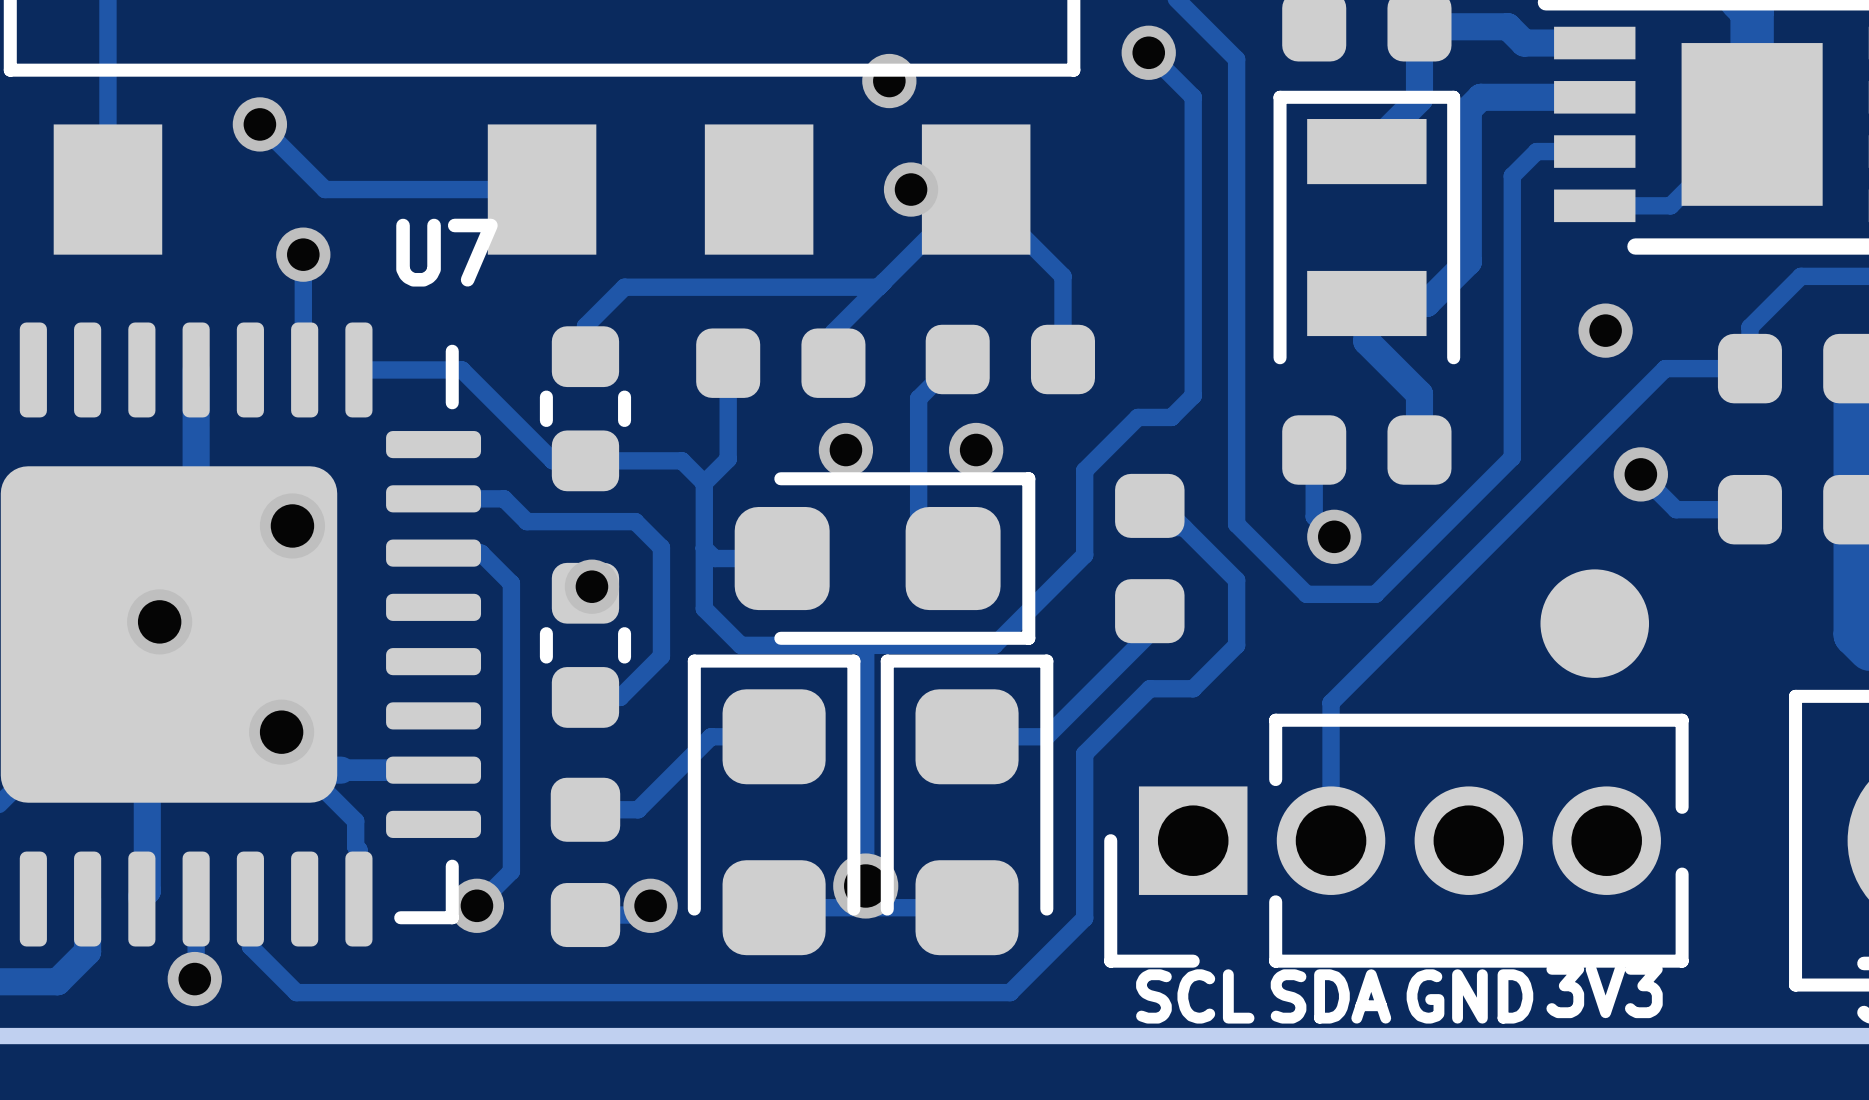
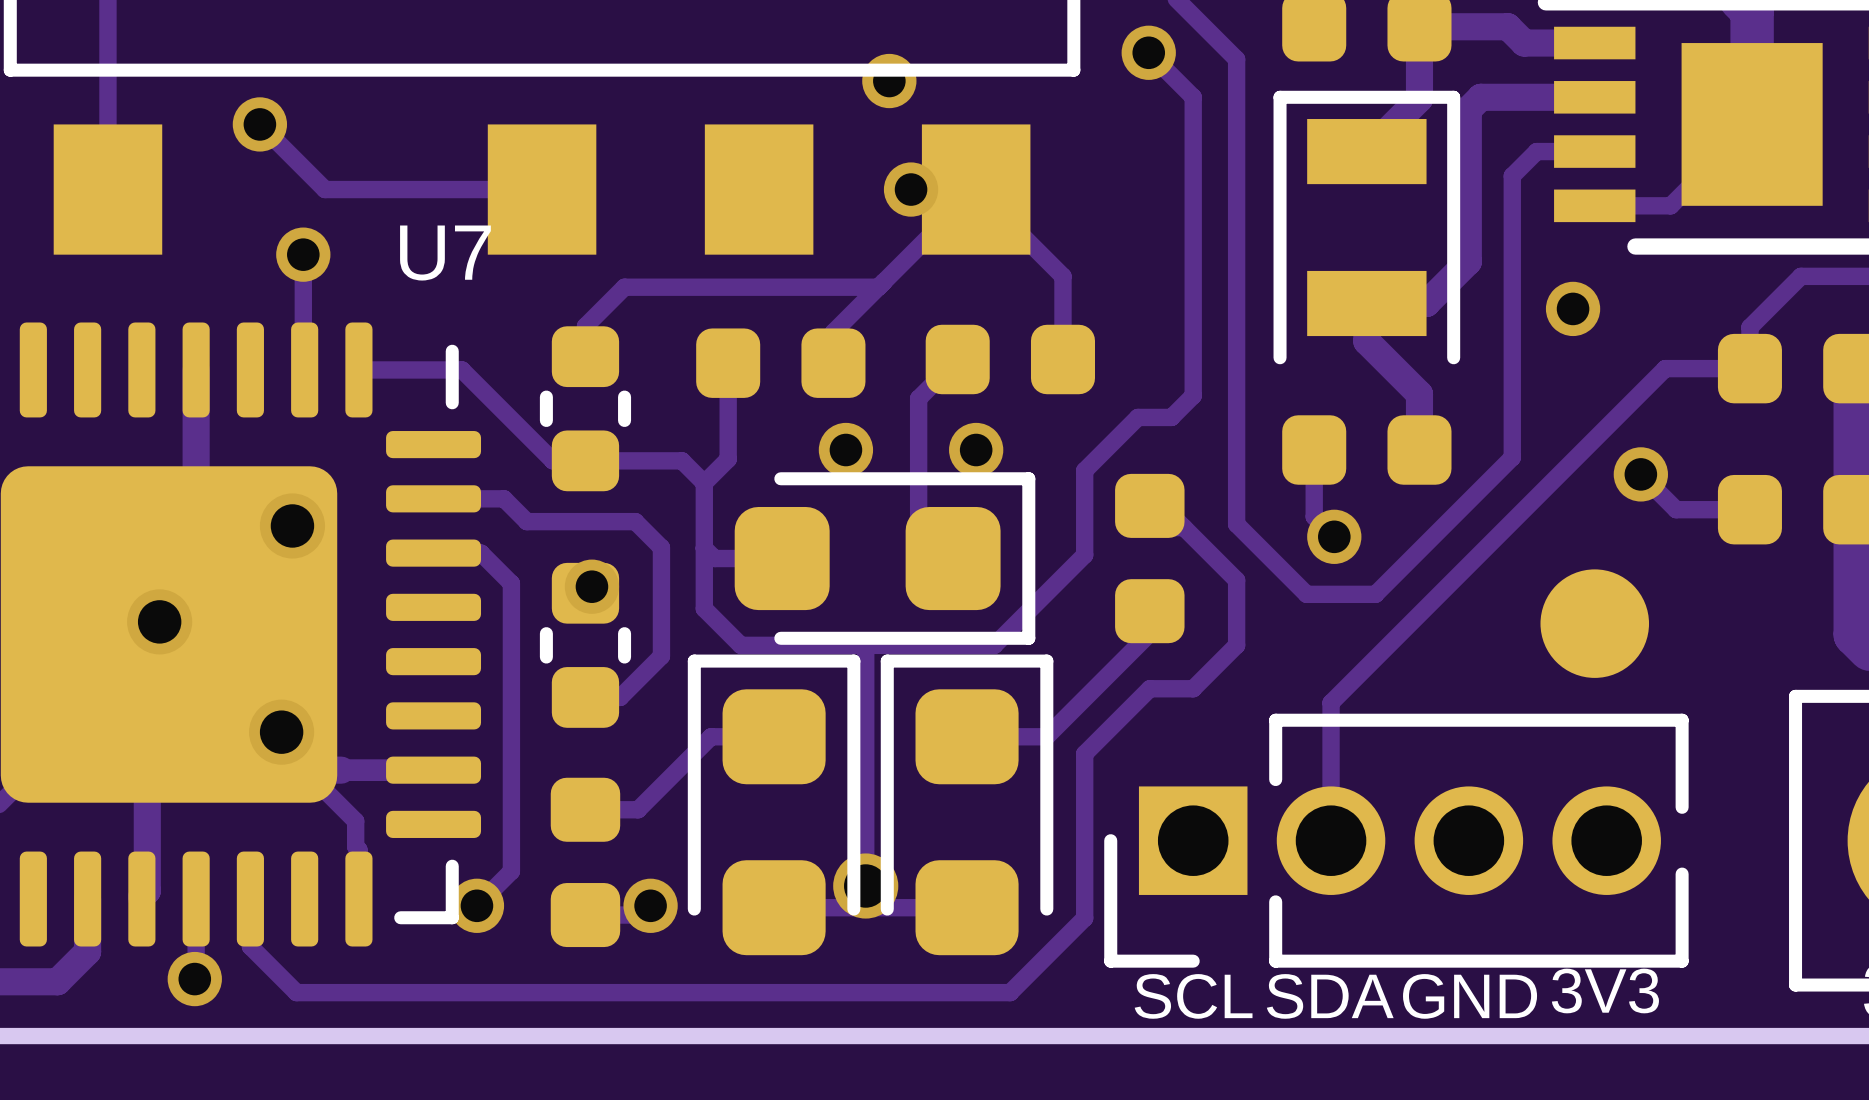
via position: (1605, 330) -> (1573, 308)

